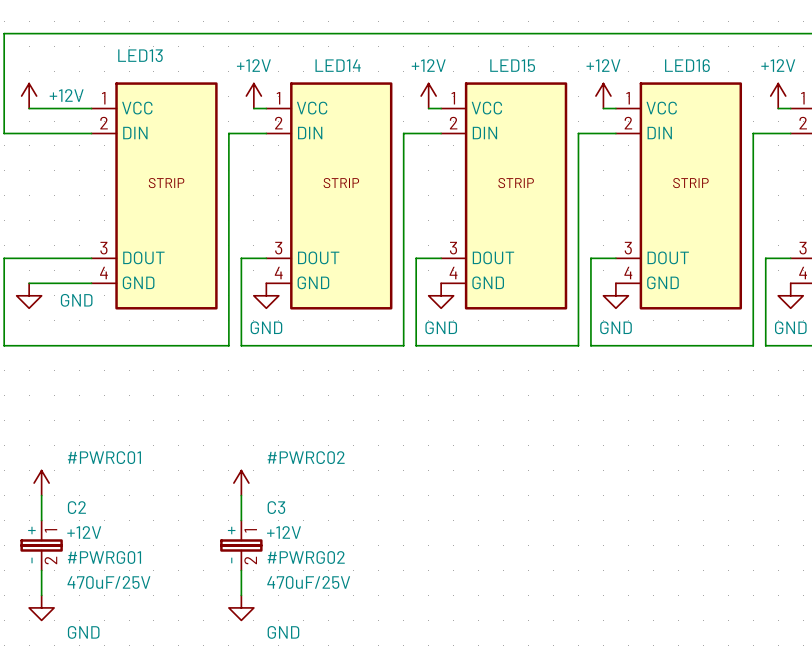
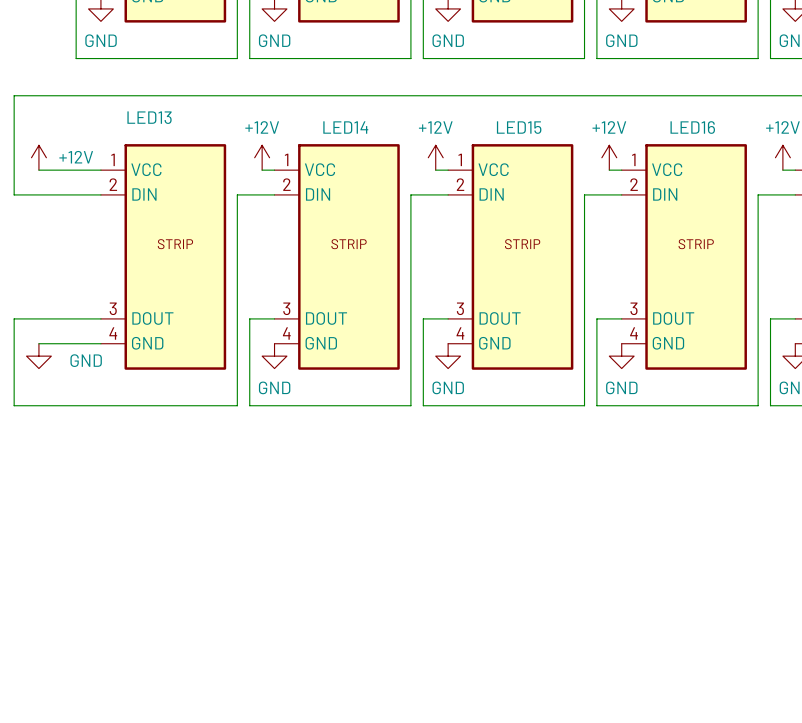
#PWRC01: +12V (41, 483) -> none
#PWRC02: +12V (241, 483) -> none
wire: (41, 495) (41, 520) -> none
wire: (241, 495) (241, 520) -> none
C2: 470uF/25V (41, 545) -> none
C3: 470uF/25V (241, 545) -> none
wire: (41, 570) (41, 595) -> none
wire: (241, 570) (241, 595) -> none
#PWRG01: GND (41, 607) -> none
#PWRG02: GND (241, 607) -> none

